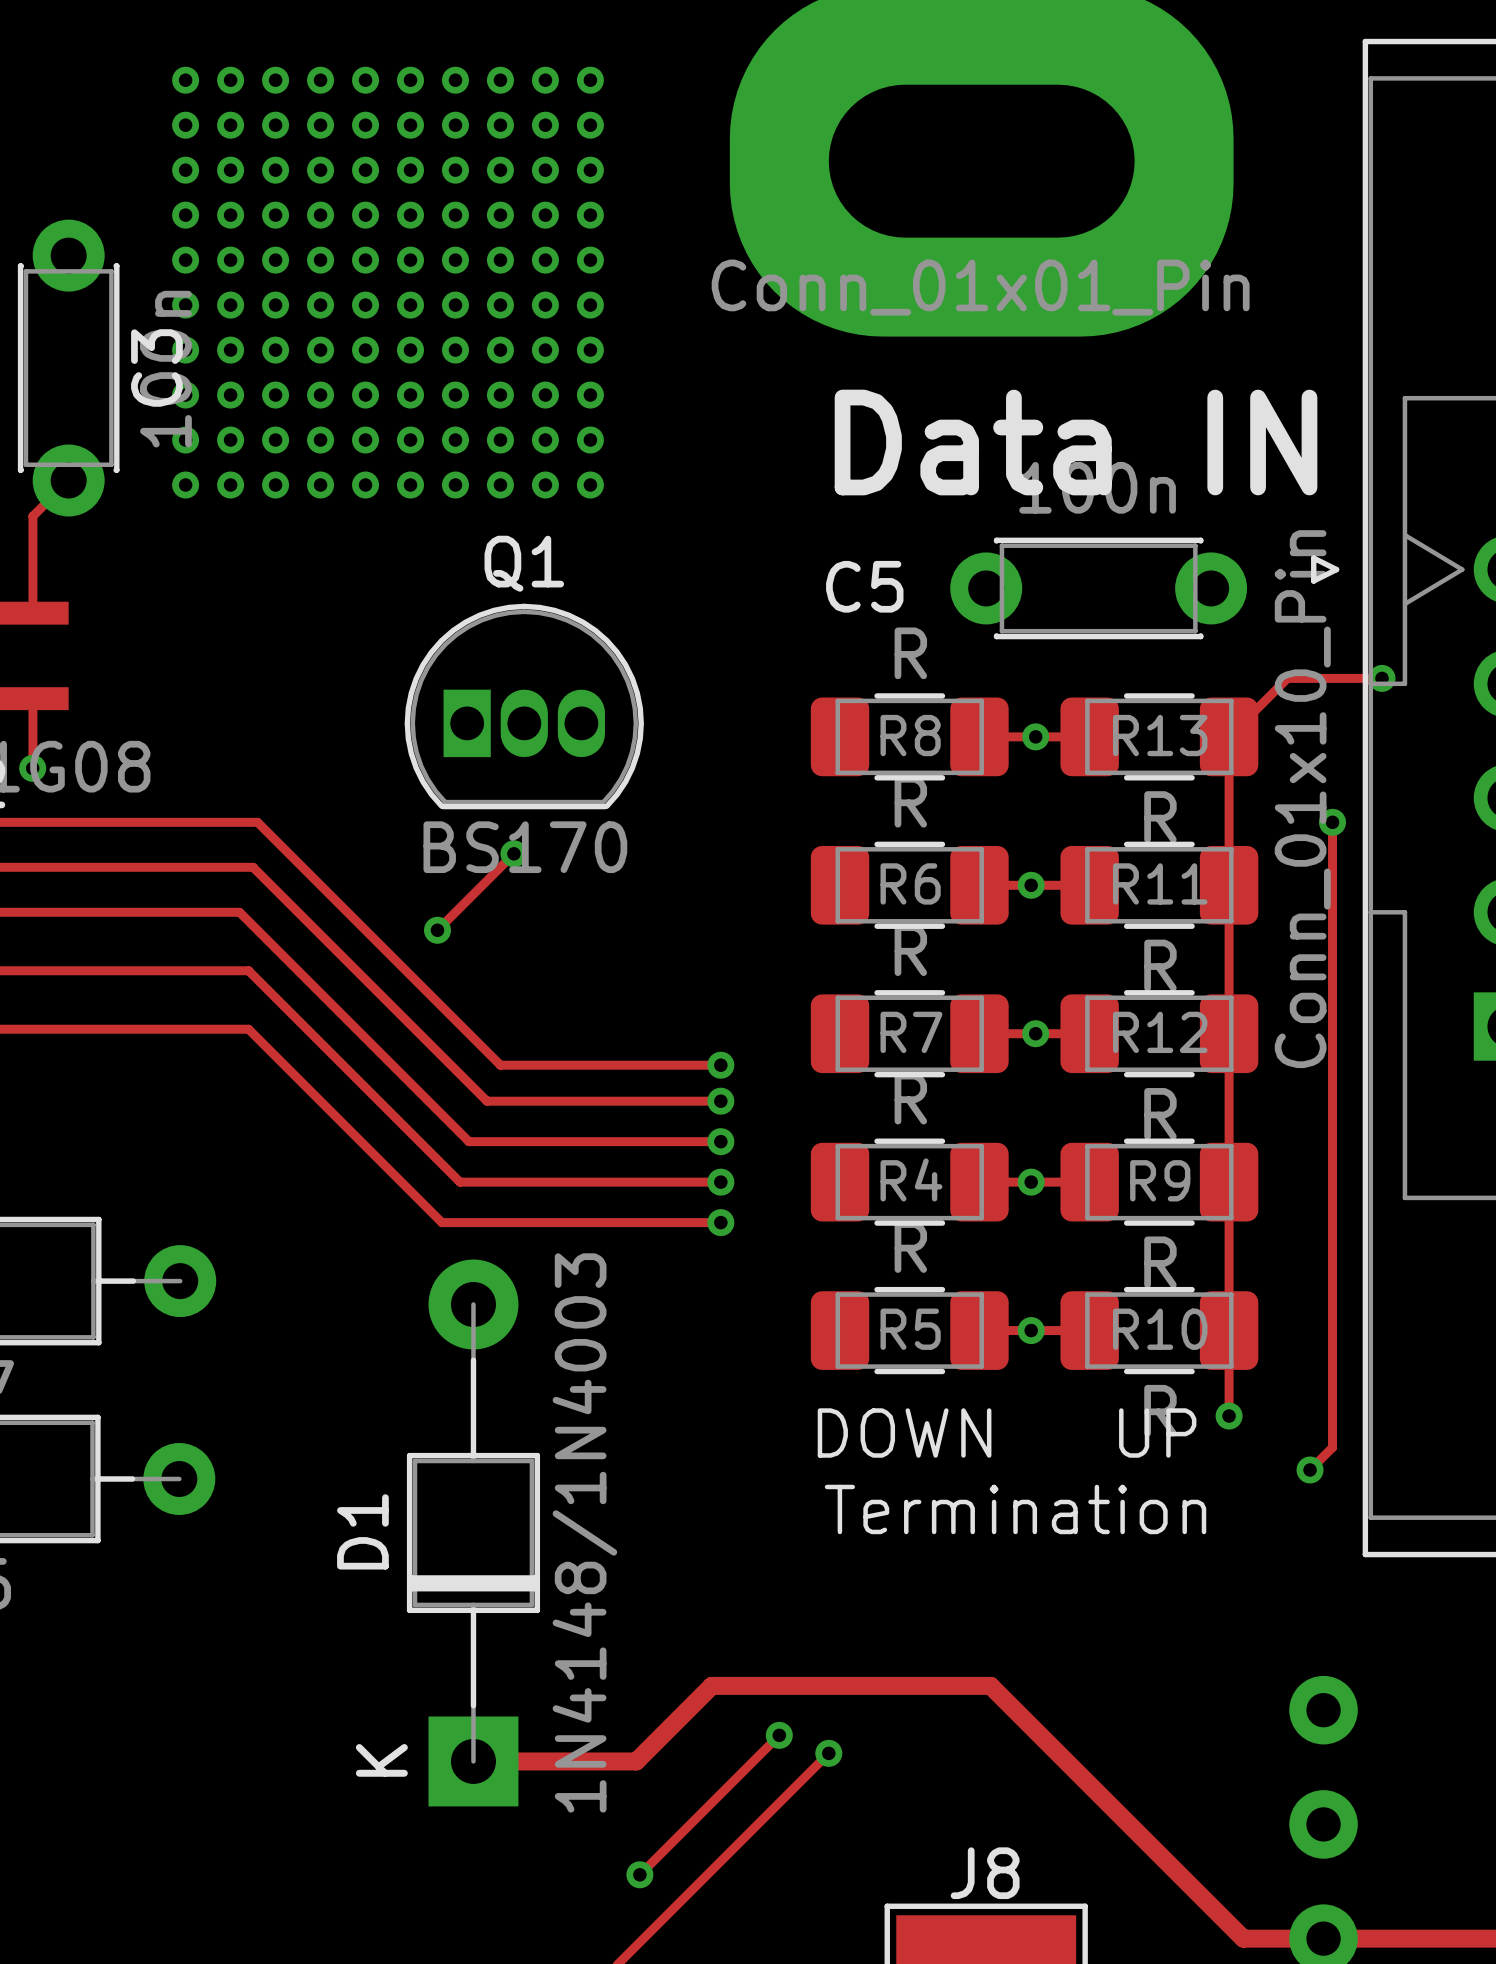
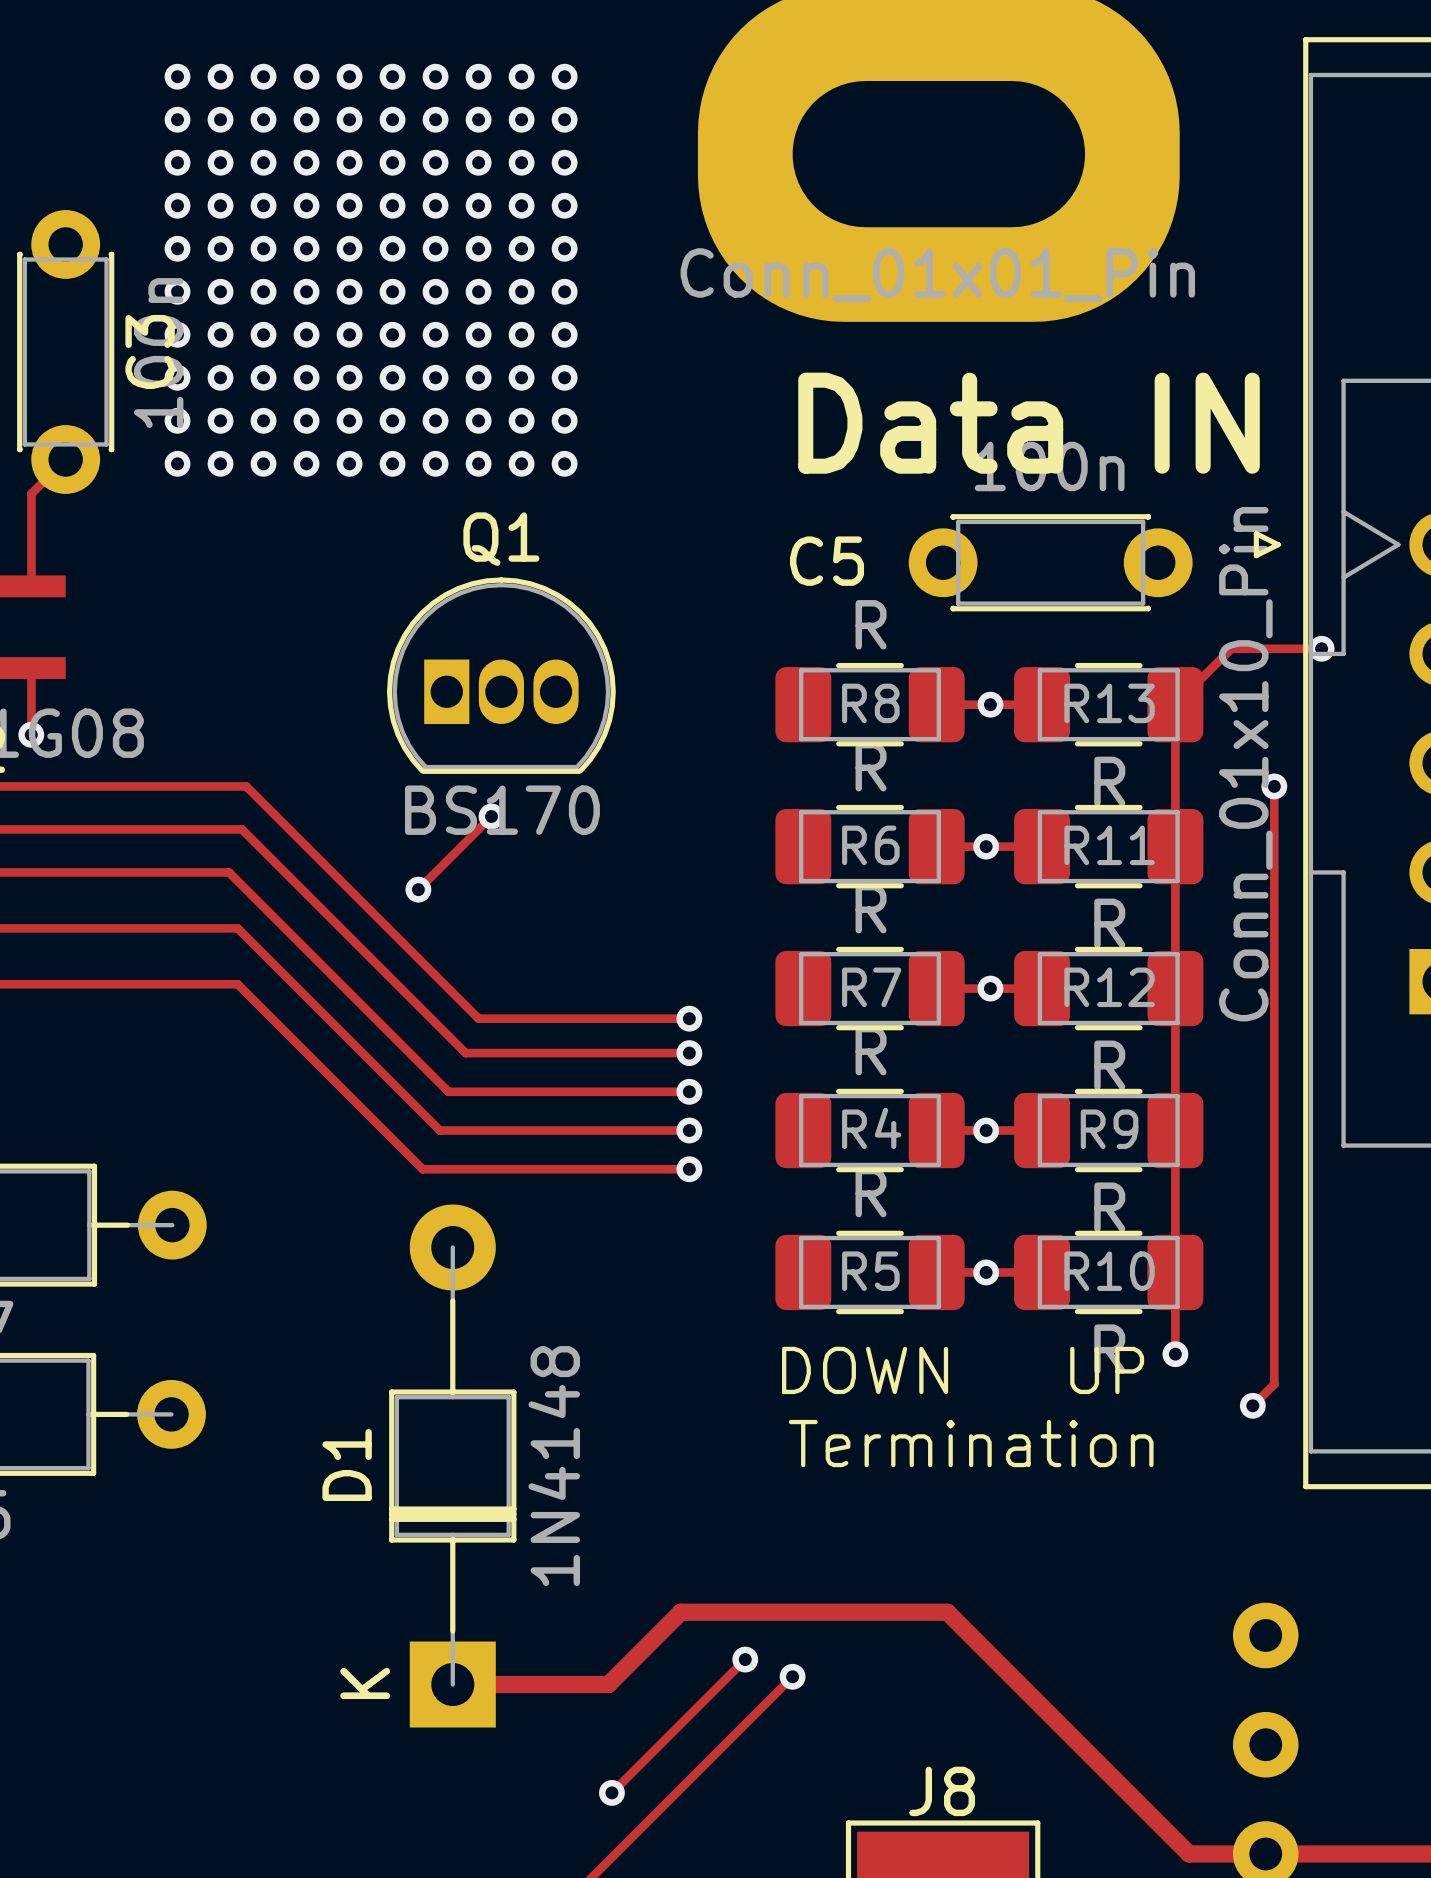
D1 value: 1N4148/1N4003 (584, 1532) -> 1N4148 (554, 1466)

